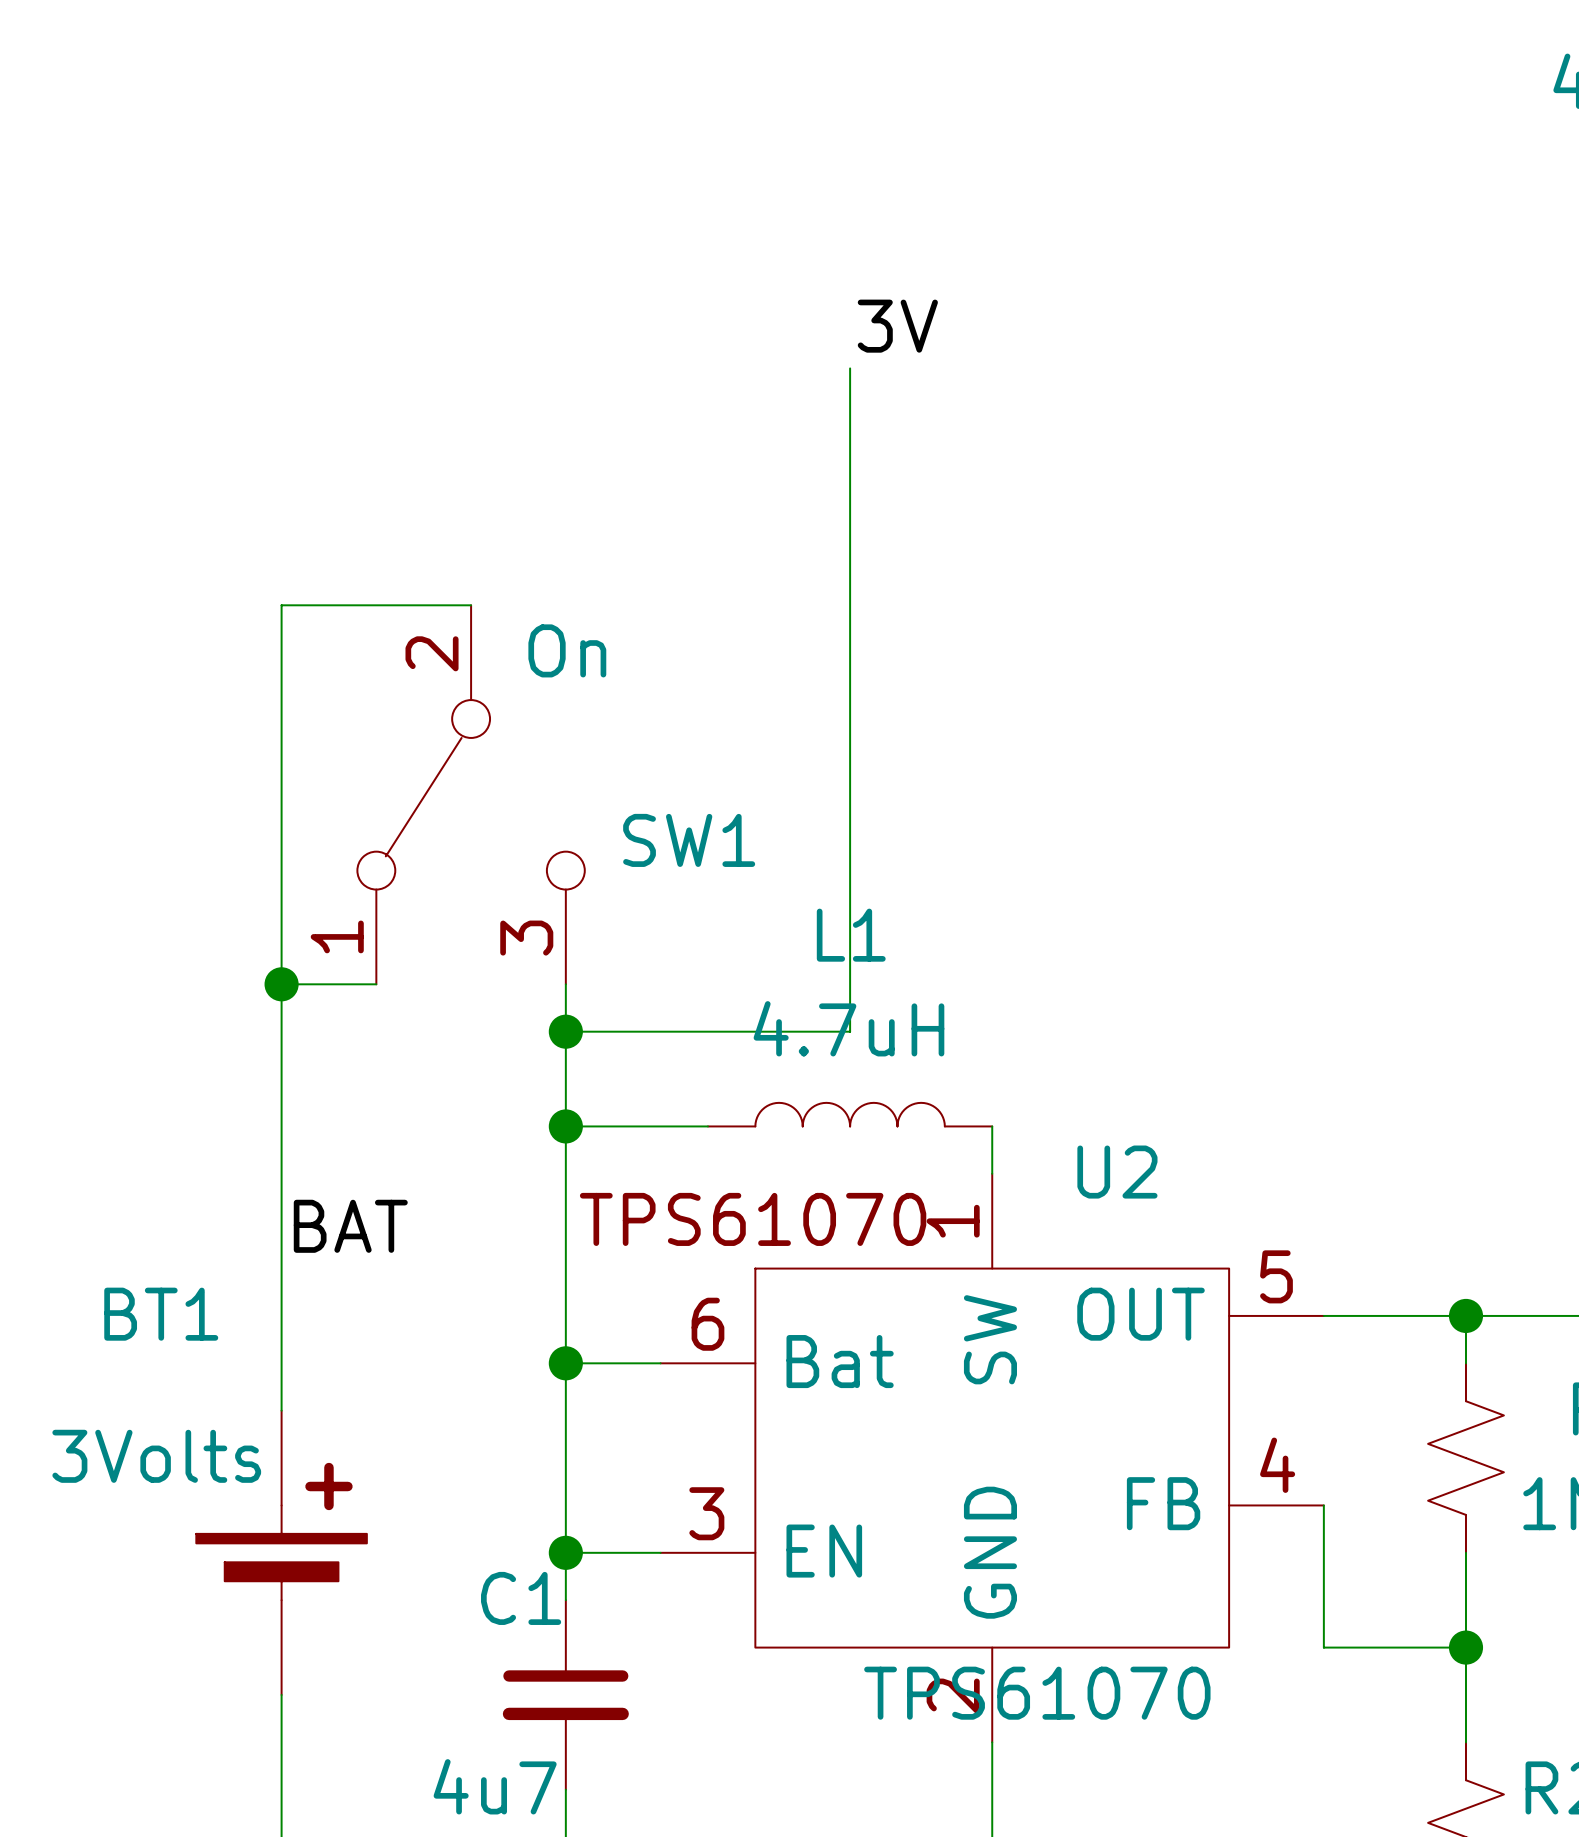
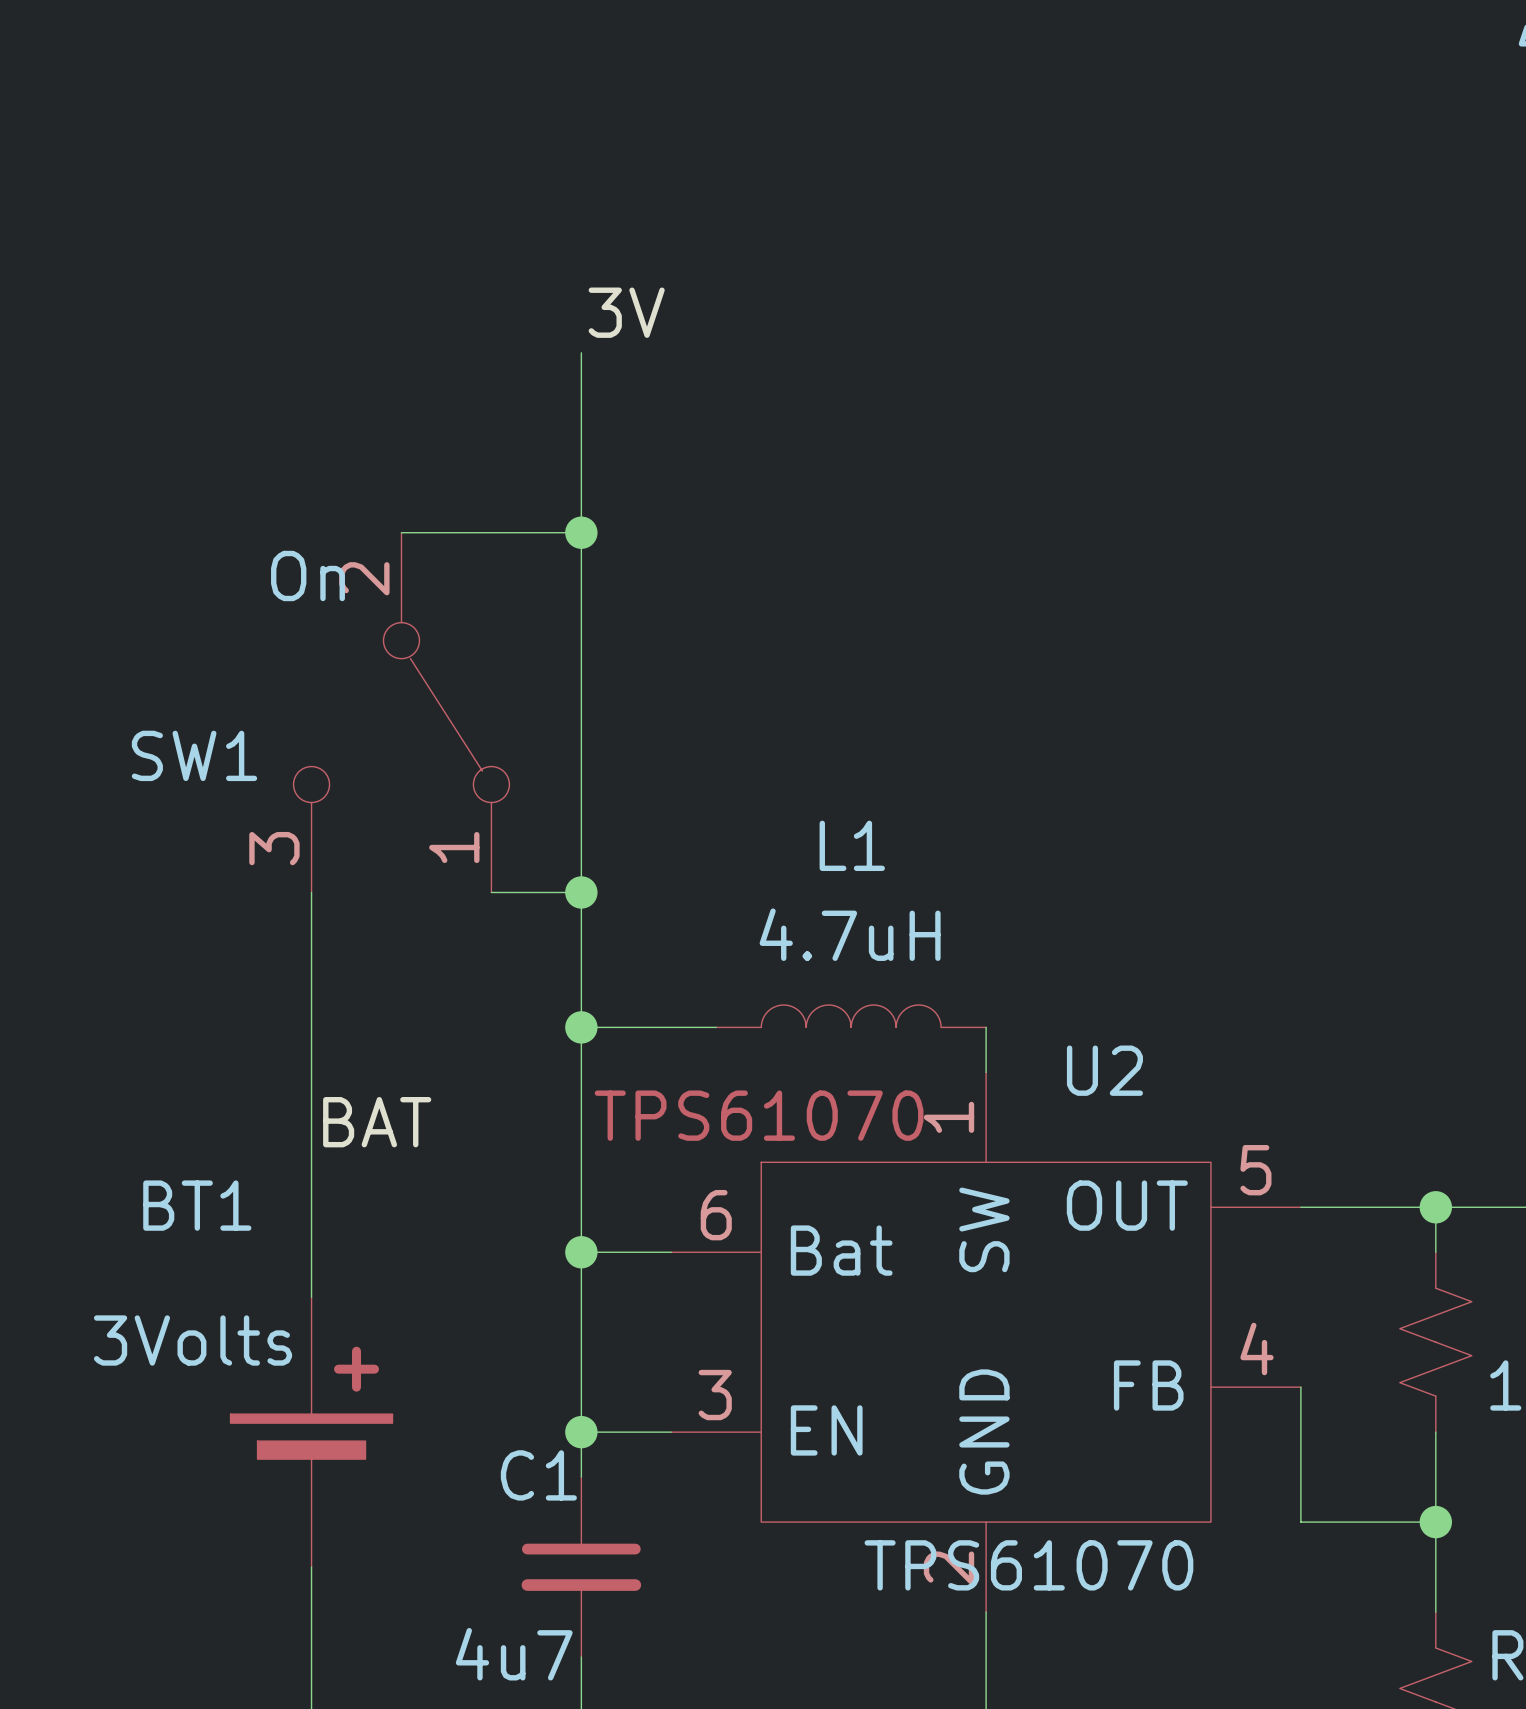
label position: 3V (897, 326) -> 3V (626, 312)
wire: (850, 368) (850, 1031) (565, 1031) -> none
wire: none -> (581, 352) (581, 892) (491, 892)
wire: (376, 605) (281, 605) (281, 984) (376, 984) -> none
wire: none -> (491, 532) (581, 532)
junction: none -> (581, 532)
SW1 flip: as is (471, 794) -> left-right (401, 712)
junction: (281, 984) -> none
junction position: (565, 1031) -> (581, 892)

